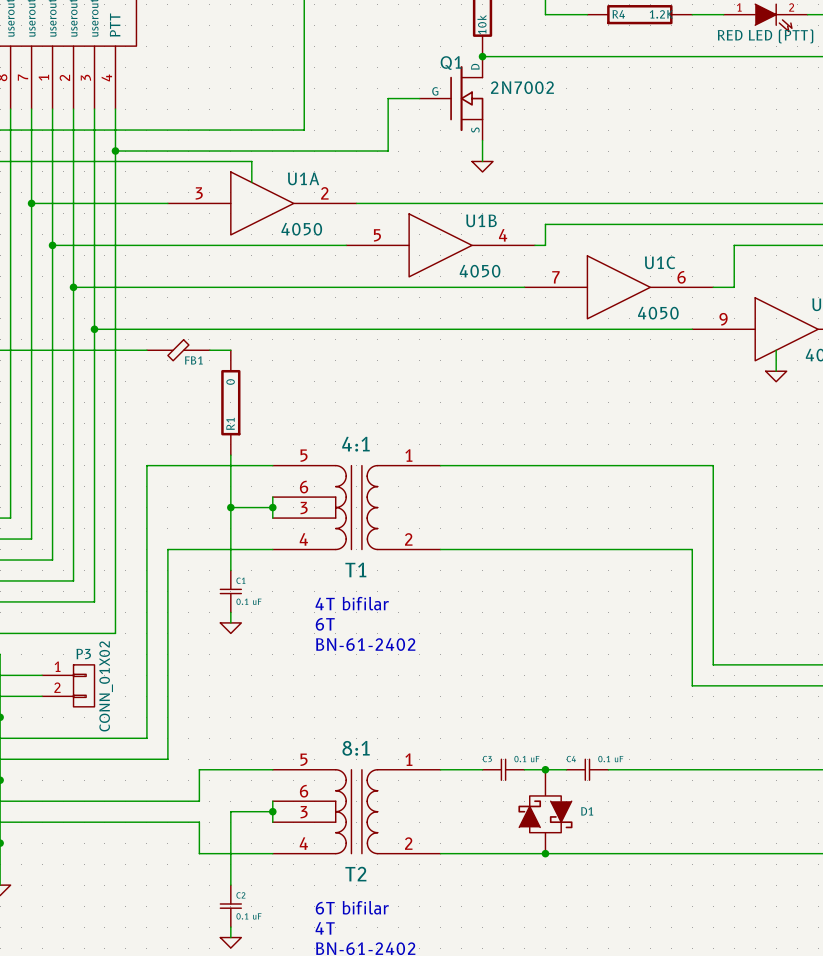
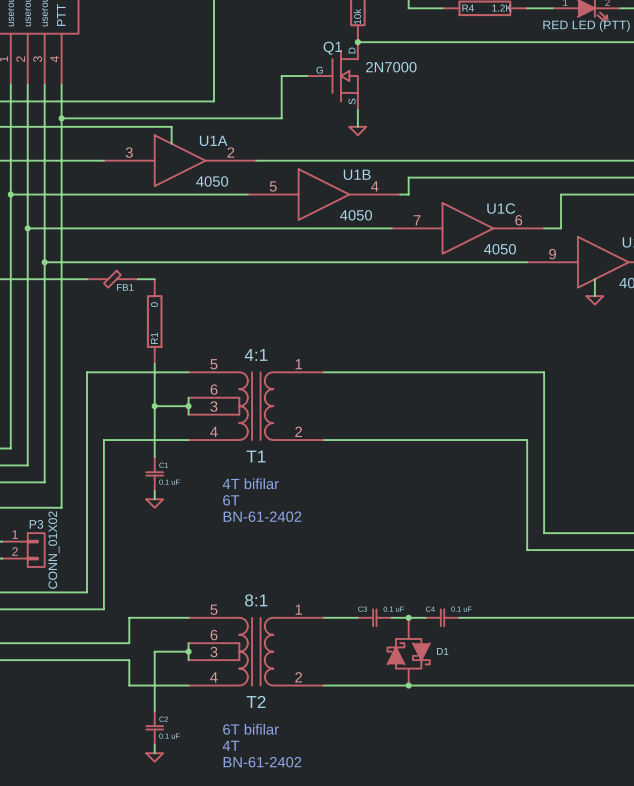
Q1 value: 2N7002 (522, 87) -> 2N7000 (391, 67)

